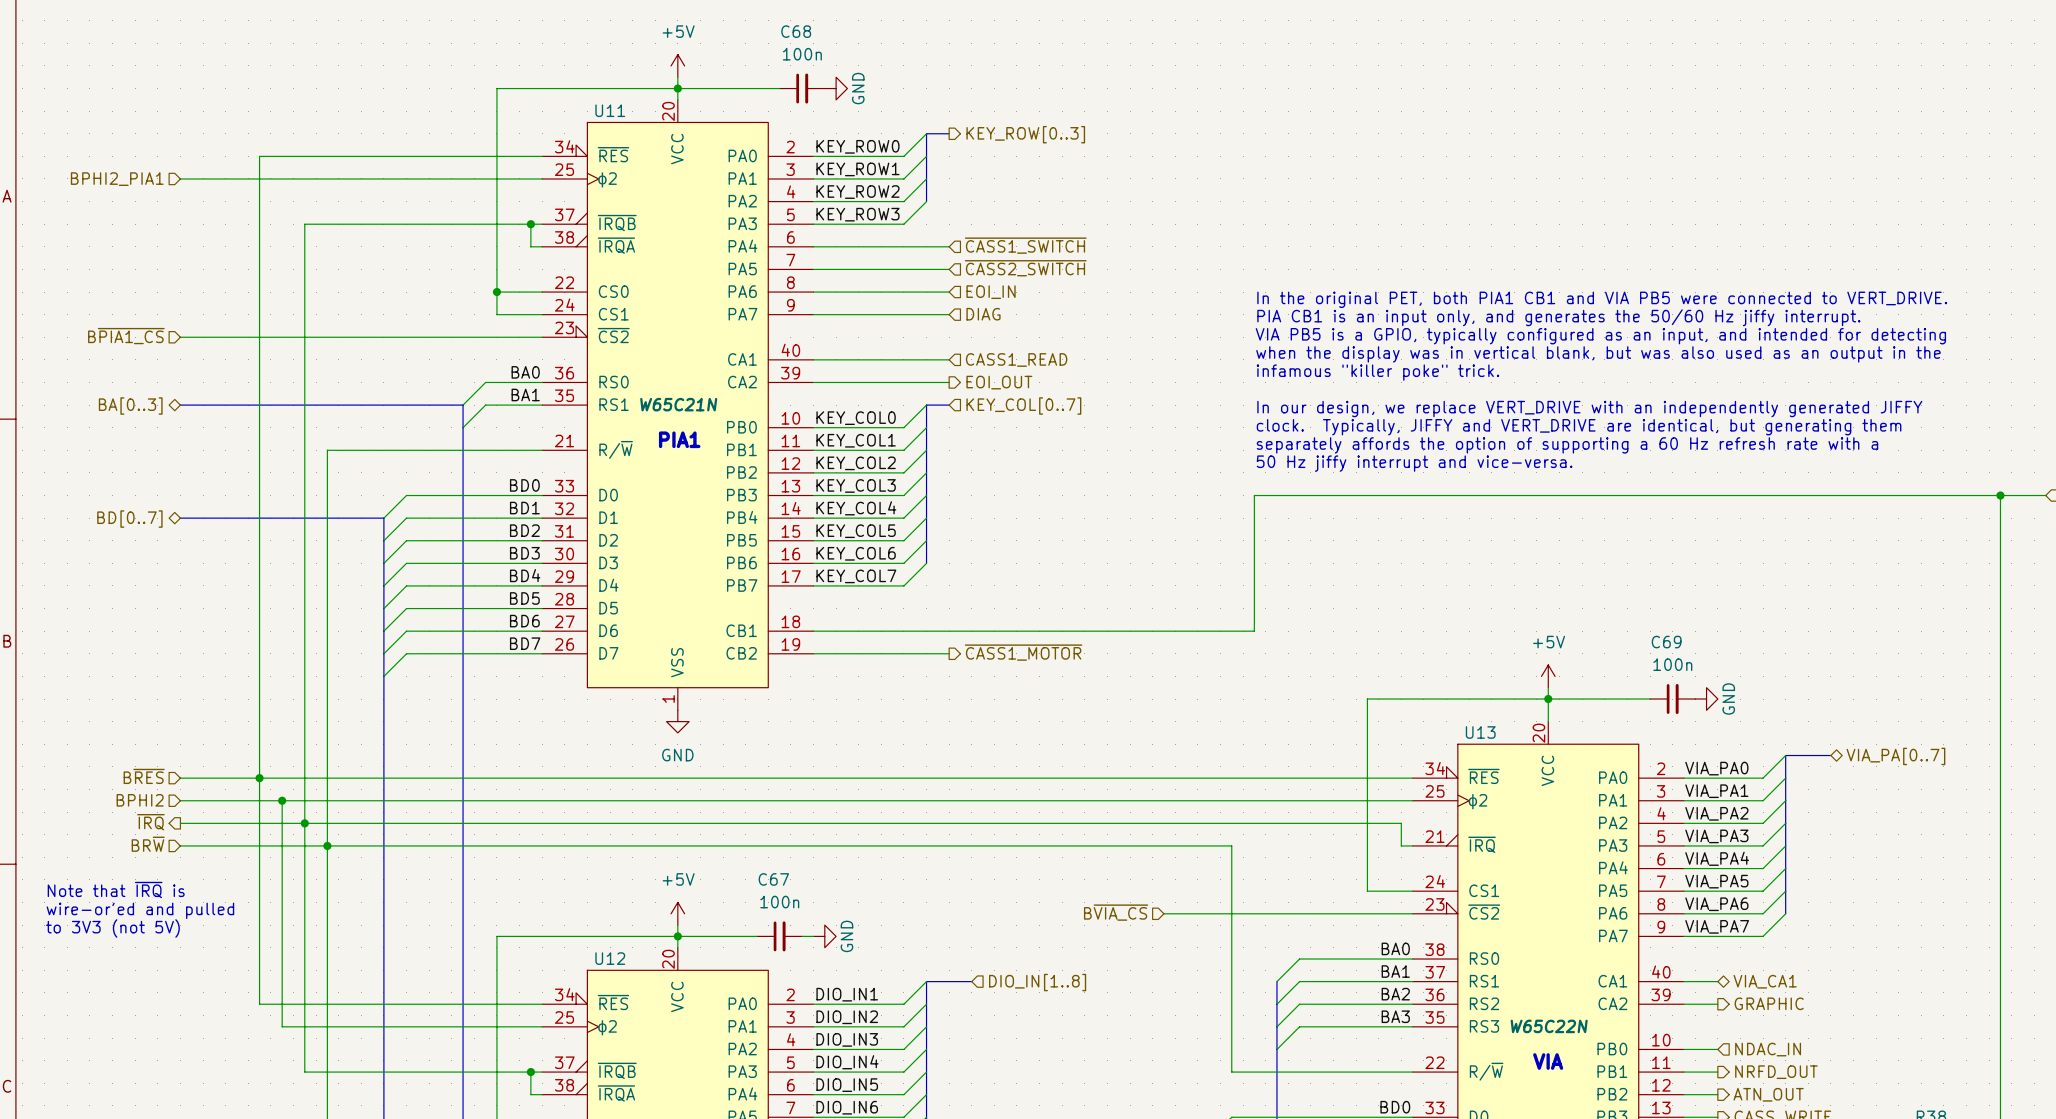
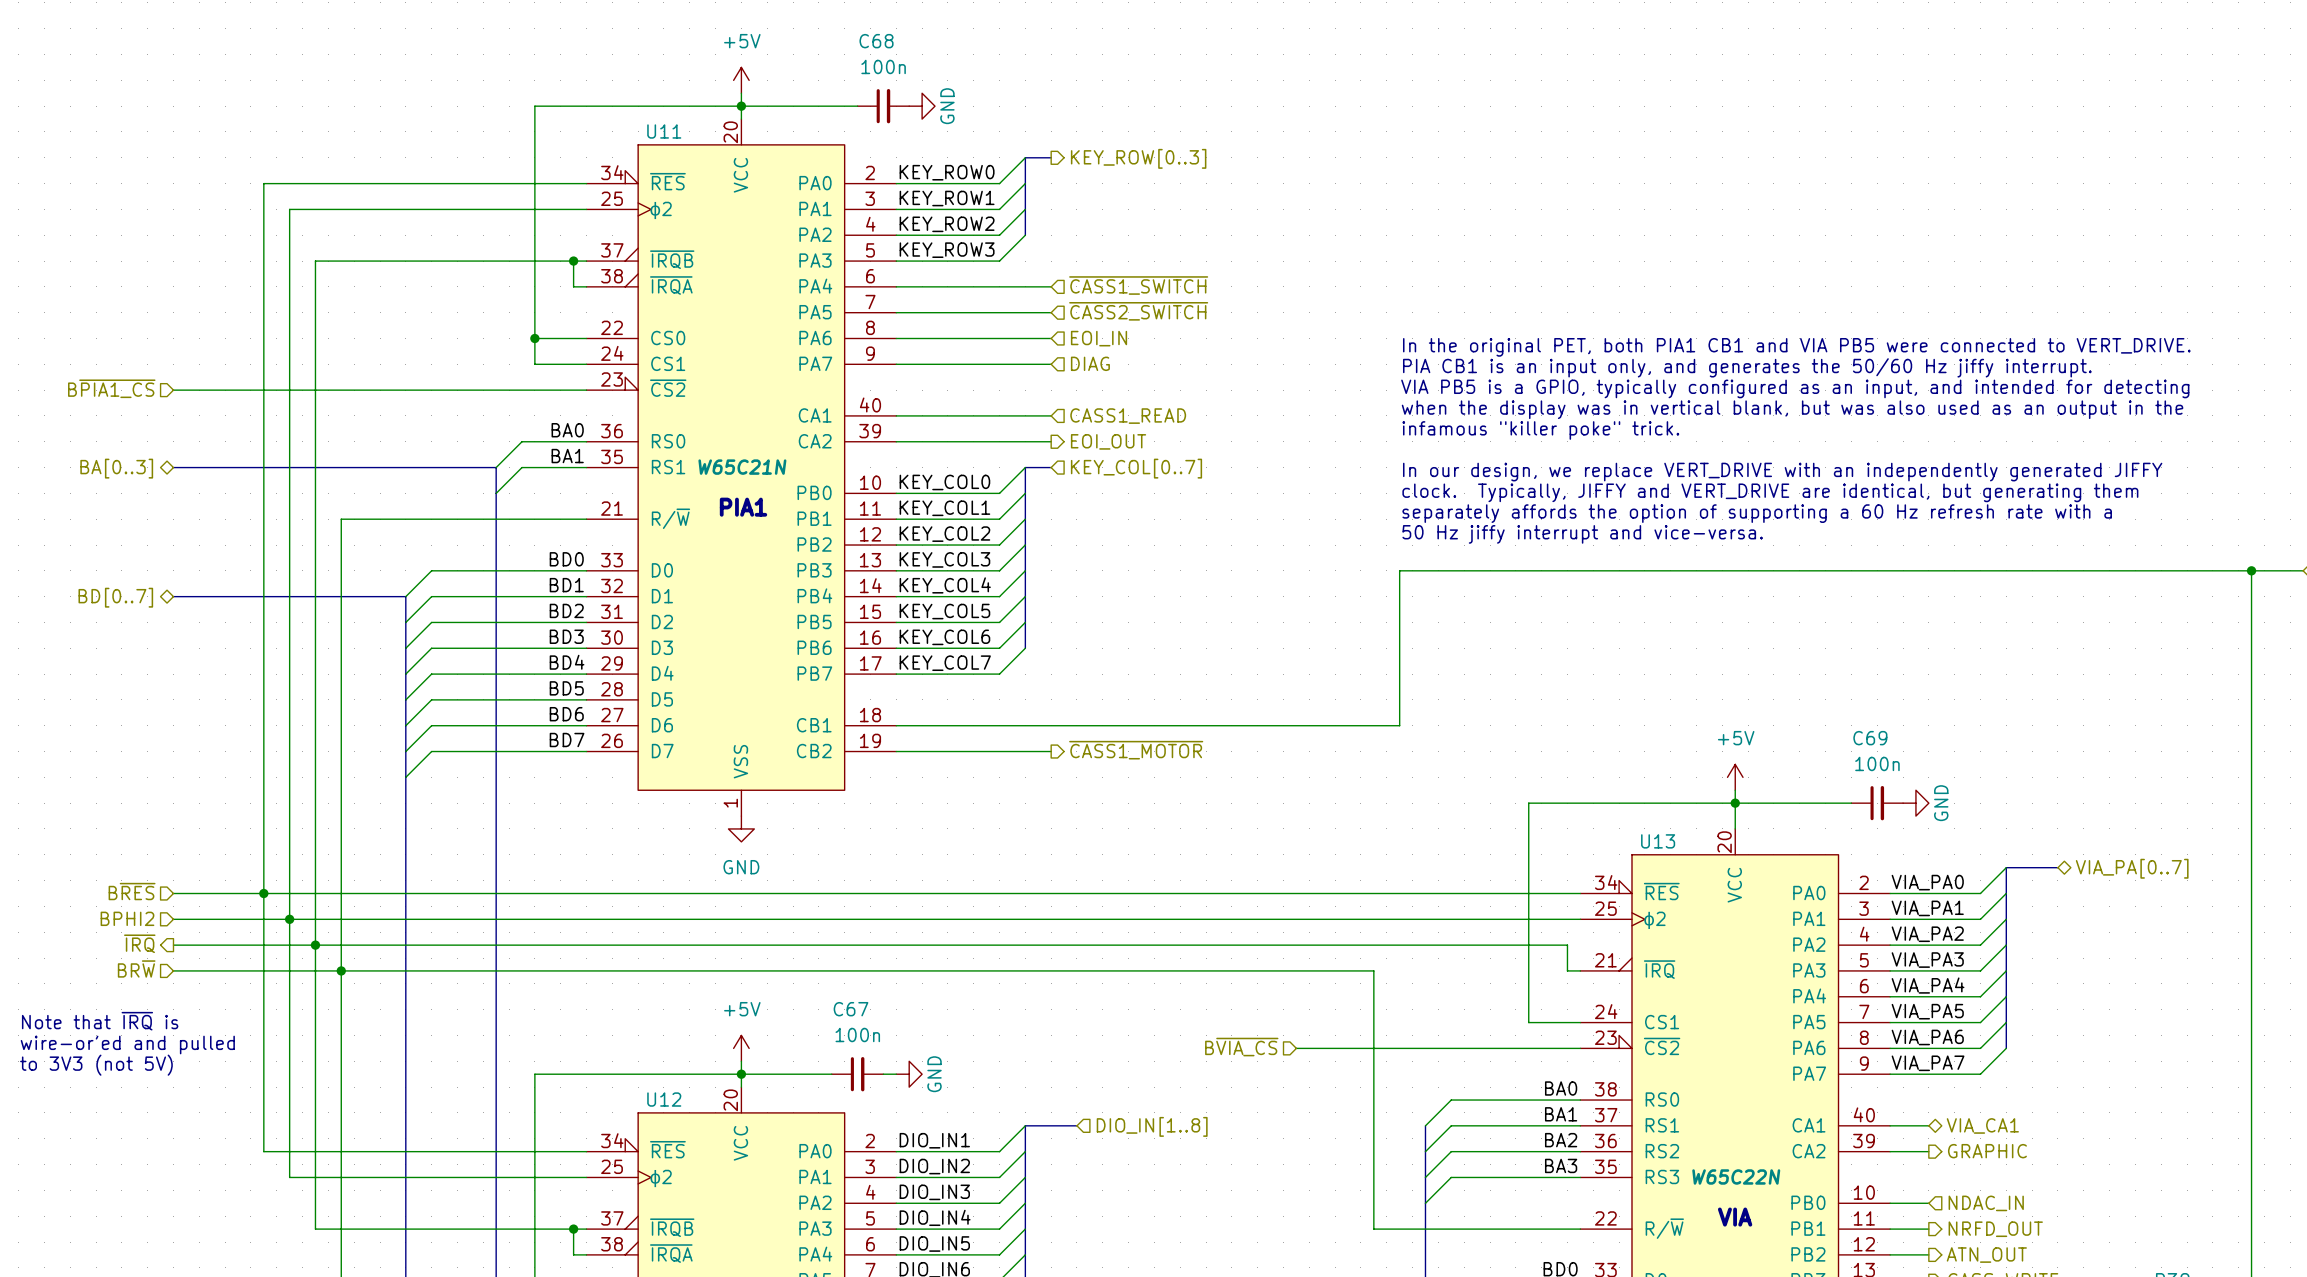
wire: (180, 178) (282, 178) -> (289, 919) (289, 209)
hierarchical label: BPHI2_PIA1 (117, 179) -> none

